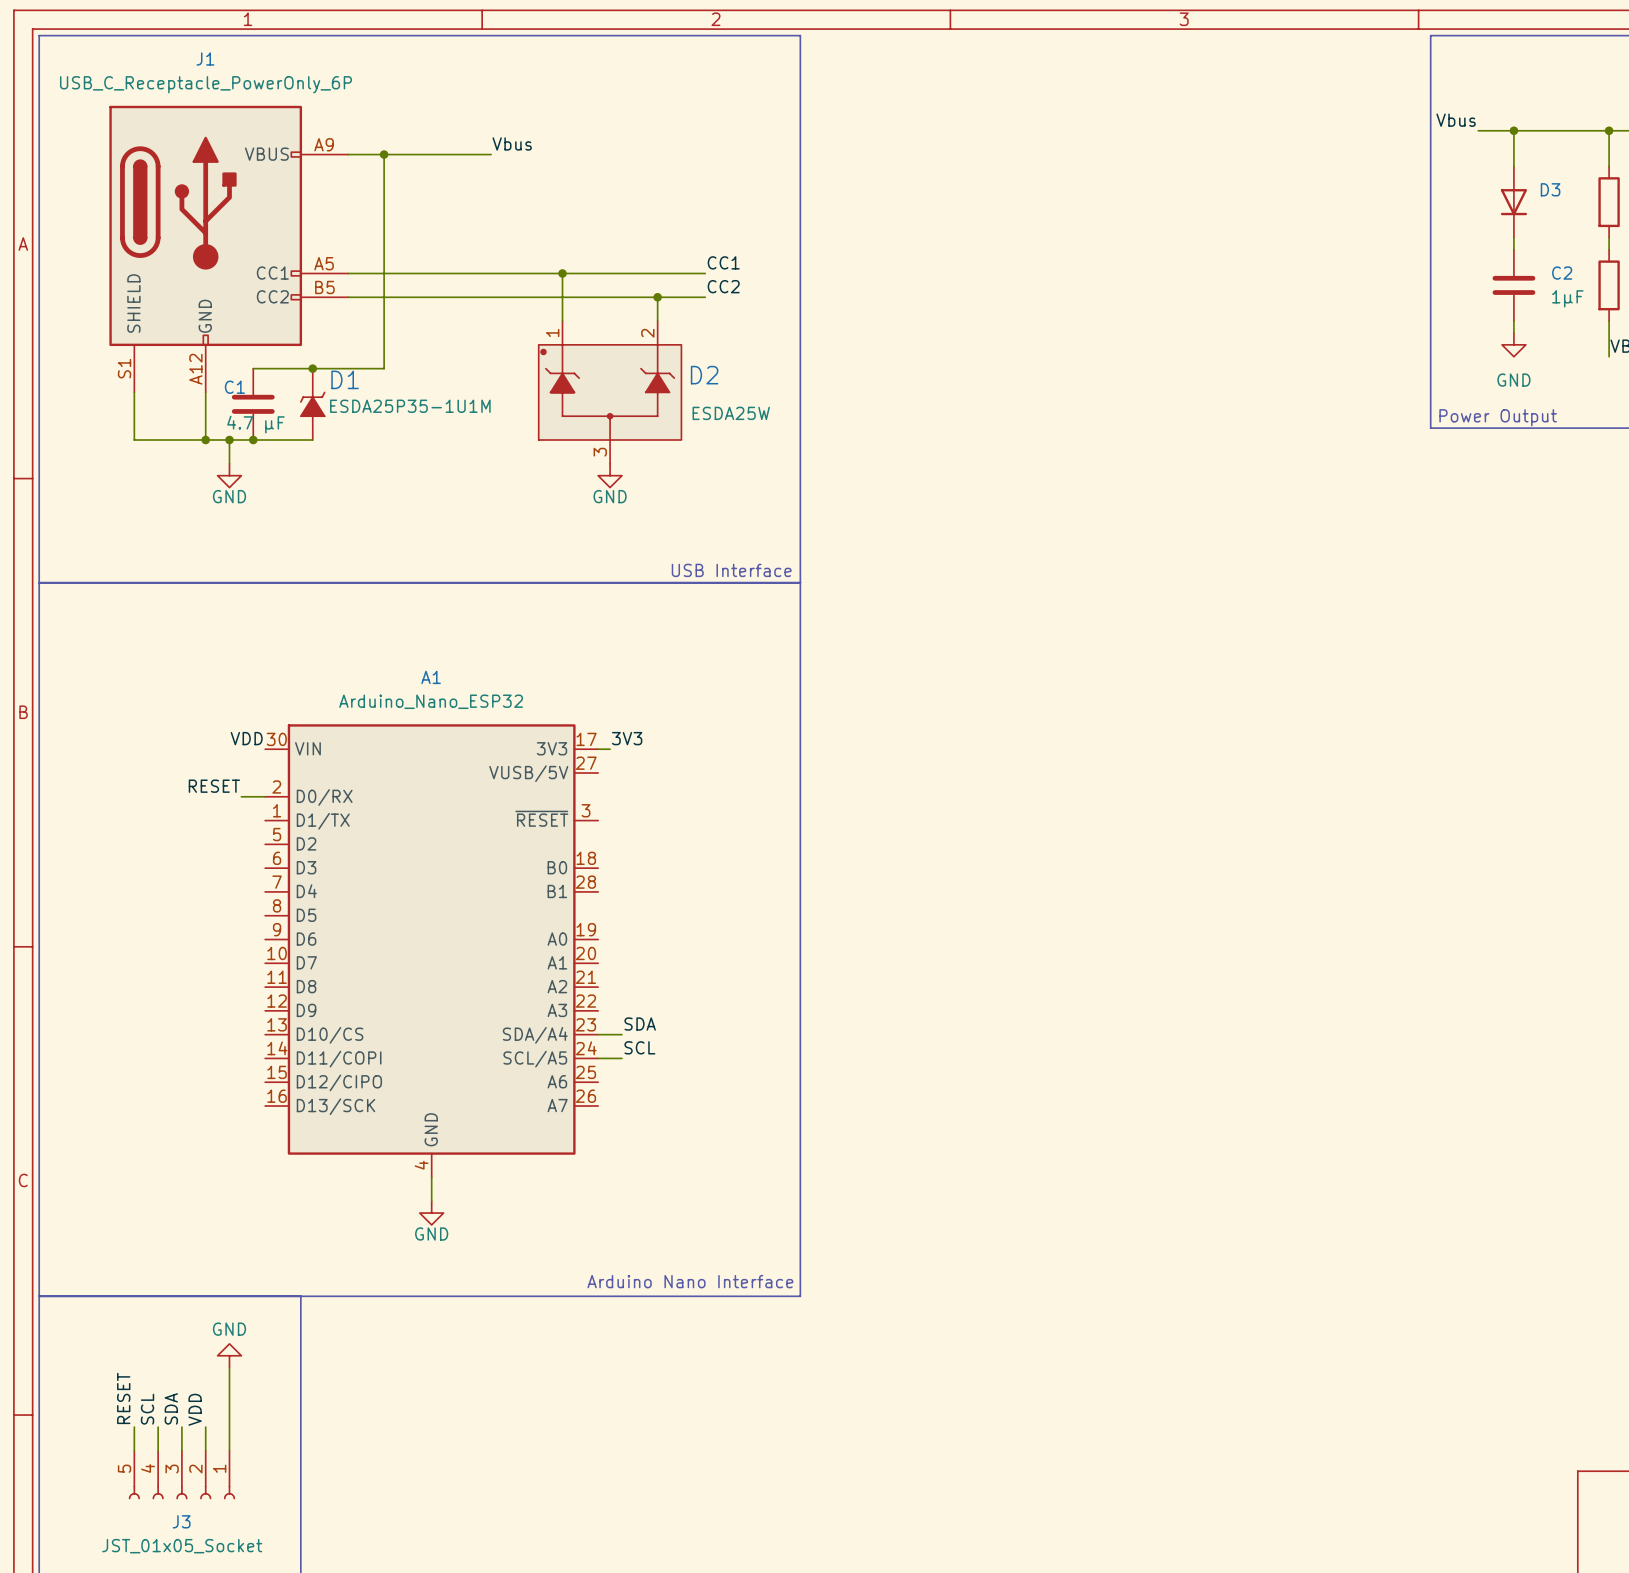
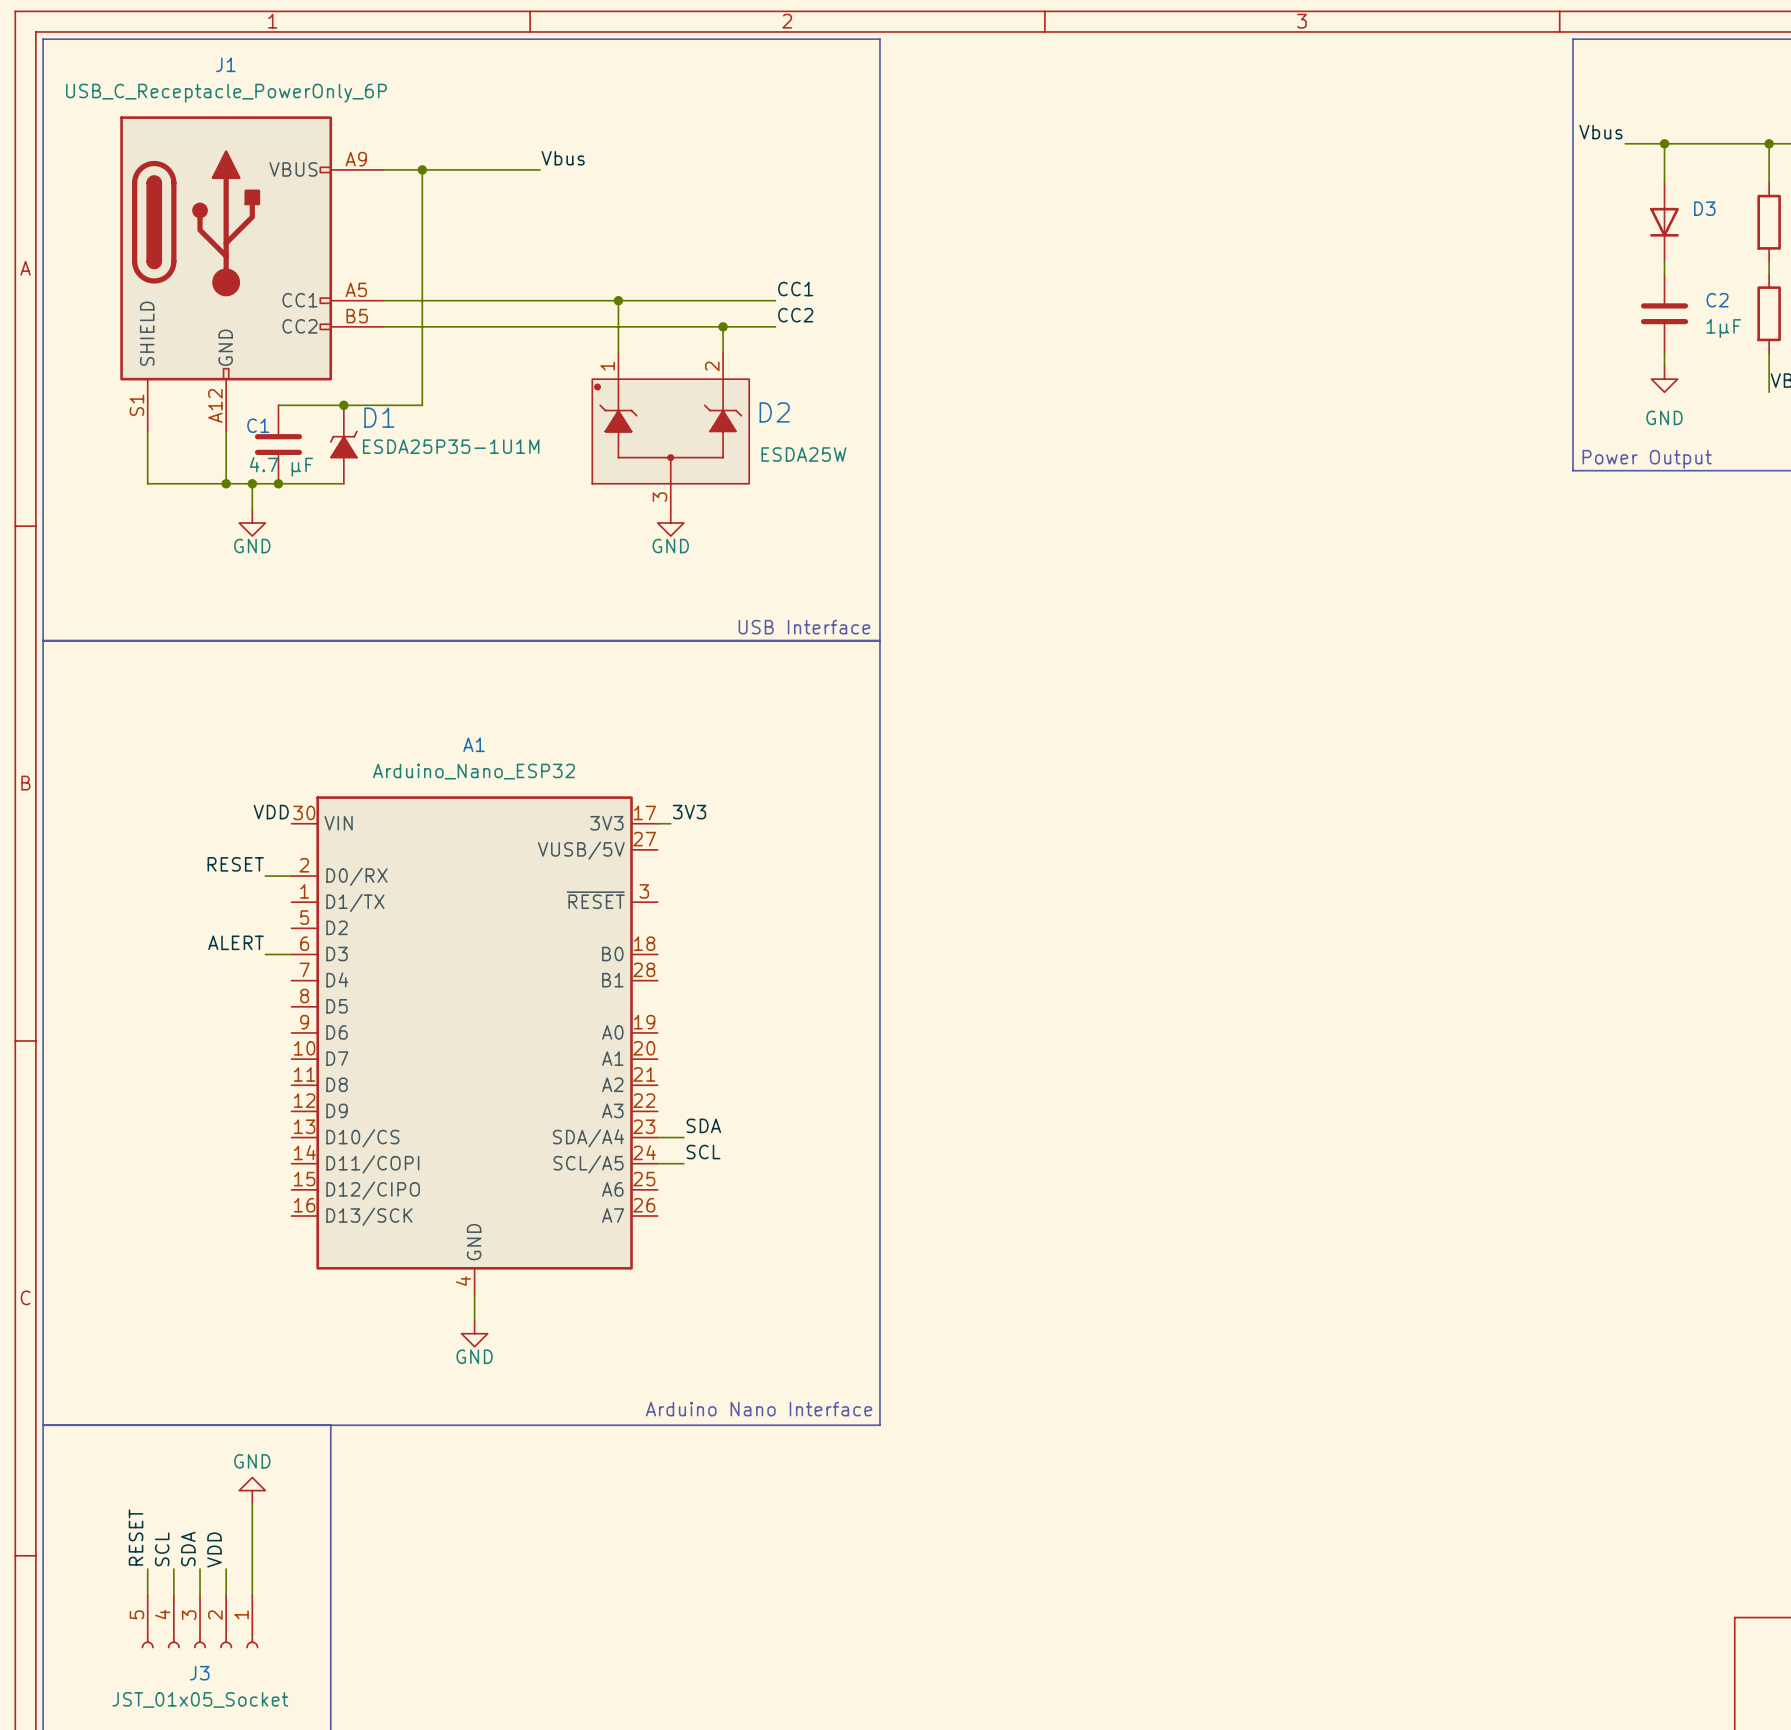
label: none -> ALERT (236, 942)
wire: none -> (265, 954) (291, 954)

